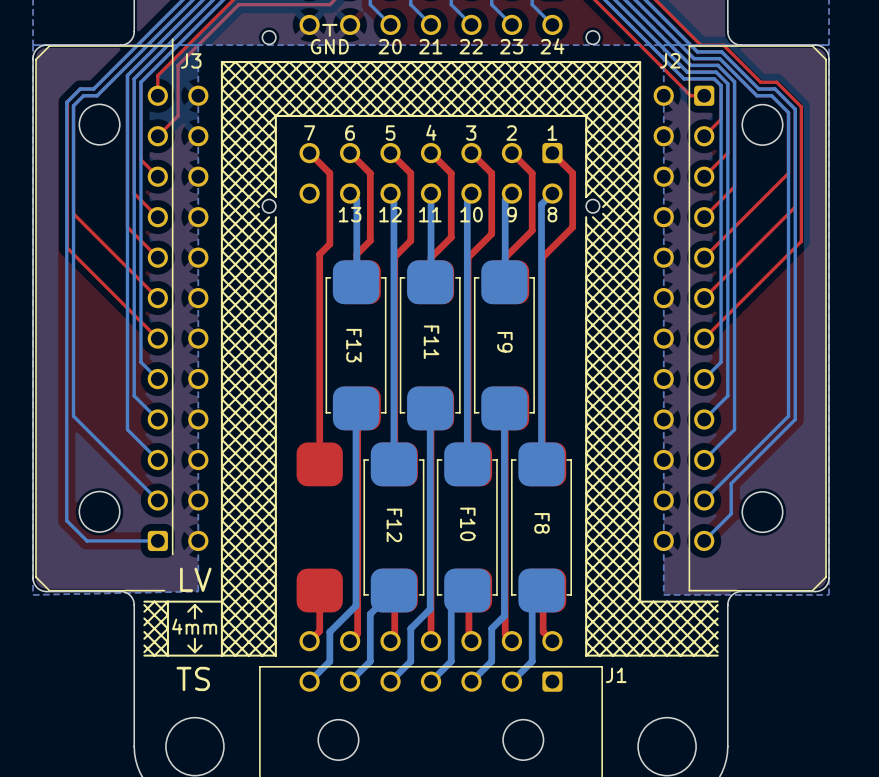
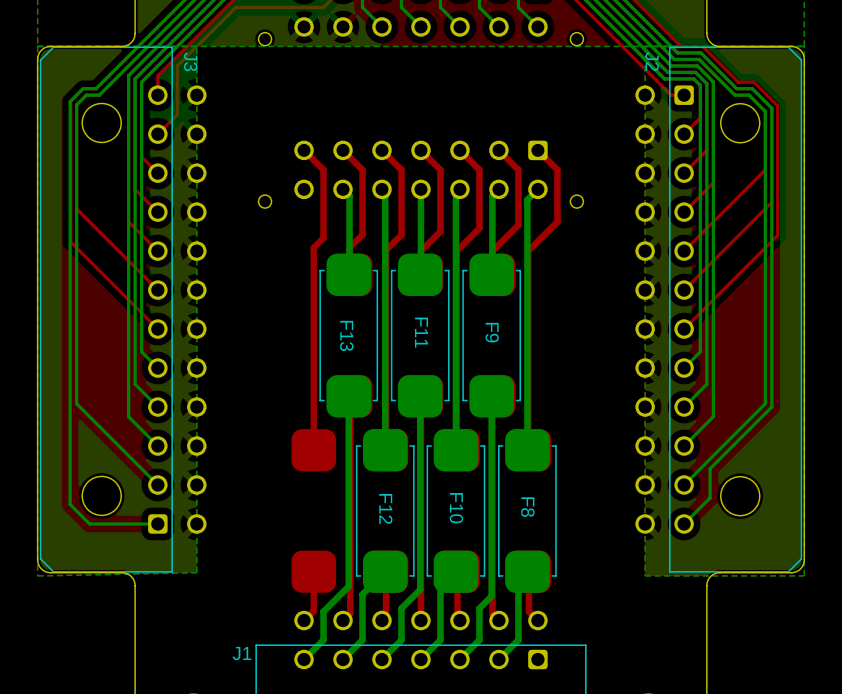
line: (329, 24) (329, 35) -> none
line: (336, 24) (323, 24) -> none
J3 footprint: [35, 38, 209, 592] -> [39, 46, 207, 573]
text: GND (329, 46) -> none
text: 20 (390, 46) -> none
text: 21 (430, 46) -> none
text: 22 (471, 46) -> none
text: 23 (511, 46) -> none
text: 24 (552, 46) -> none
J2 name rotation: 0° (670, 60) -> 90° clockwise (652, 61)
line: (221, 62) (275, 115) -> none
line: (221, 62) (221, 655) (275, 601) (221, 547) (275, 493) (221, 439) (275, 385) (221, 331) (275, 277) (221, 223) (275, 169) (221, 115) (275, 62) (329, 115) (383, 62) (437, 115) (491, 62) (545, 115) (599, 62) (640, 102) (586, 156) (640, 210) (586, 264) (640, 318) (586, 372) (640, 426) (586, 480) (640, 534) (586, 588) (653, 655) (707, 601) (717, 611) -> none
line: (640, 62) (640, 601) -> none
line: (640, 62) (586, 115) -> none
line: (640, 62) (221, 62) -> none
line: (275, 115) (275, 196) (221, 142) (302, 62) (356, 115) (410, 62) (464, 115) (518, 62) (572, 115) (626, 62) (640, 75) (586, 129) (640, 183) (586, 237) (640, 291) (586, 345) (640, 399) (586, 453) (640, 507) (586, 561) (680, 655) (717, 618) -> none
line: (586, 115) (275, 115) -> none
line: (586, 115) (586, 196) (640, 142) (559, 62) (505, 115) (451, 62) (397, 115) (343, 62) (289, 115) (235, 62) (221, 75) (275, 129) (221, 183) (275, 237) (221, 291) (275, 345) (221, 399) (275, 453) (221, 507) (275, 561) (221, 615) (262, 655) (275, 642) (221, 588) (275, 534) (221, 480) (275, 426) (221, 372) (275, 318) (221, 264) (269, 217) -> none
text: 4 (431, 132) -> none
text: 7 (309, 133) -> none
text: 6 (350, 133) -> none
text: 5 (390, 133) -> none
text: 3 (471, 133) -> none
text: 2 (511, 133) -> none
text: 1 (552, 133) -> none
line: (262, 196) (221, 156) (316, 62) (370, 115) (424, 62) (478, 115) (532, 62) (640, 169) (603, 207) -> none
line: (599, 196) (640, 156) (545, 62) (491, 115) (437, 62) (383, 115) (329, 62) (221, 169) (259, 207) -> none
line: (259, 213) (221, 250) (275, 304) (221, 358) (275, 412) (221, 466) (275, 520) (221, 574) (275, 628) (248, 655) (221, 628) (275, 574) (221, 520) (275, 466) (221, 412) (275, 358) (221, 304) (275, 250) (221, 196) (275, 142) (221, 89) (248, 62) (302, 115) (356, 62) (410, 115) (464, 62) (518, 115) (572, 62) (640, 129) (586, 183) (640, 237) (586, 291) (640, 345) (586, 399) (640, 453) (586, 507) (640, 561) (586, 615) (626, 655) (680, 601) (717, 638) -> none
line: (603, 213) (640, 250) (586, 304) (640, 358) (586, 412) (640, 466) (586, 520) (640, 574) (586, 628) (613, 655) (667, 601) (717, 652) -> none
text: 13 (350, 214) -> none
text: 12 (390, 214) -> none
text: 11 (430, 214) -> none
text: 10 (471, 214) -> none
text: 9 (511, 214) -> none
text: 8 (552, 214) -> none
line: (275, 217) (275, 655) -> none
line: (586, 217) (586, 655) -> none
line: (592, 217) (640, 264) (586, 318) (640, 372) (586, 426) (640, 480) (586, 534) (640, 588) (586, 642) (599, 655) (653, 601) (707, 655) (717, 645) -> none
line: (275, 223) (221, 277) (275, 331) (221, 385) (275, 439) (221, 493) (275, 547) (221, 601) -> none
line: (586, 223) (640, 277) (586, 331) (640, 385) (586, 439) (640, 493) (586, 547) (694, 655) (717, 632) -> none
text: LV (195, 579) -> none
line: (221, 601) (144, 601) -> none
line: (221, 601) (275, 655) -> none
line: (640, 601) (586, 655) -> none
line: (717, 601) (640, 601) -> none
line: (144, 605) (167, 628) (144, 652) -> none
line: (194, 605) (194, 618) -> none
line: (194, 605) (188, 611) -> none
line: (194, 605) (201, 611) -> none
line: (717, 605) (667, 655) (586, 574) (640, 520) (586, 466) (640, 412) (586, 358) (640, 304) (586, 250) (640, 196) (586, 142) (640, 89) (613, 62) (559, 115) (505, 62) (451, 115) (397, 62) (343, 115) (289, 62) (221, 129) (275, 183) (221, 237) (275, 291) (221, 345) (275, 399) (221, 453) (275, 507) (221, 561) (275, 615) (235, 655) (221, 642) (275, 588) (221, 534) (275, 480) (221, 426) (275, 372) (221, 318) (275, 264) (221, 210) (275, 156) (221, 102) (262, 62) (316, 115) (370, 62) (424, 115) (478, 62) (532, 115) (586, 62) (640, 115) (586, 169) (640, 223) (586, 277) (640, 331) (586, 385) (640, 439) (586, 493) (640, 547) (586, 601) (640, 655) (694, 601) (717, 625) -> none
line: (144, 611) (154, 601) (167, 615) (144, 638) -> none
line: (144, 618) (167, 642) (154, 655) (144, 645) -> none
line: (144, 625) (167, 601) (167, 655) (144, 632) -> none
text: 4mm (194, 626) -> none
line: (194, 638) (194, 652) -> none
line: (188, 645) (194, 652) -> none
line: (201, 645) (194, 652) -> none
line: (275, 655) (144, 655) -> none
line: (717, 655) (586, 655) -> none
J1 name position: J1 (616, 675) -> J1 (241, 653)
text: TS (193, 678) -> none

